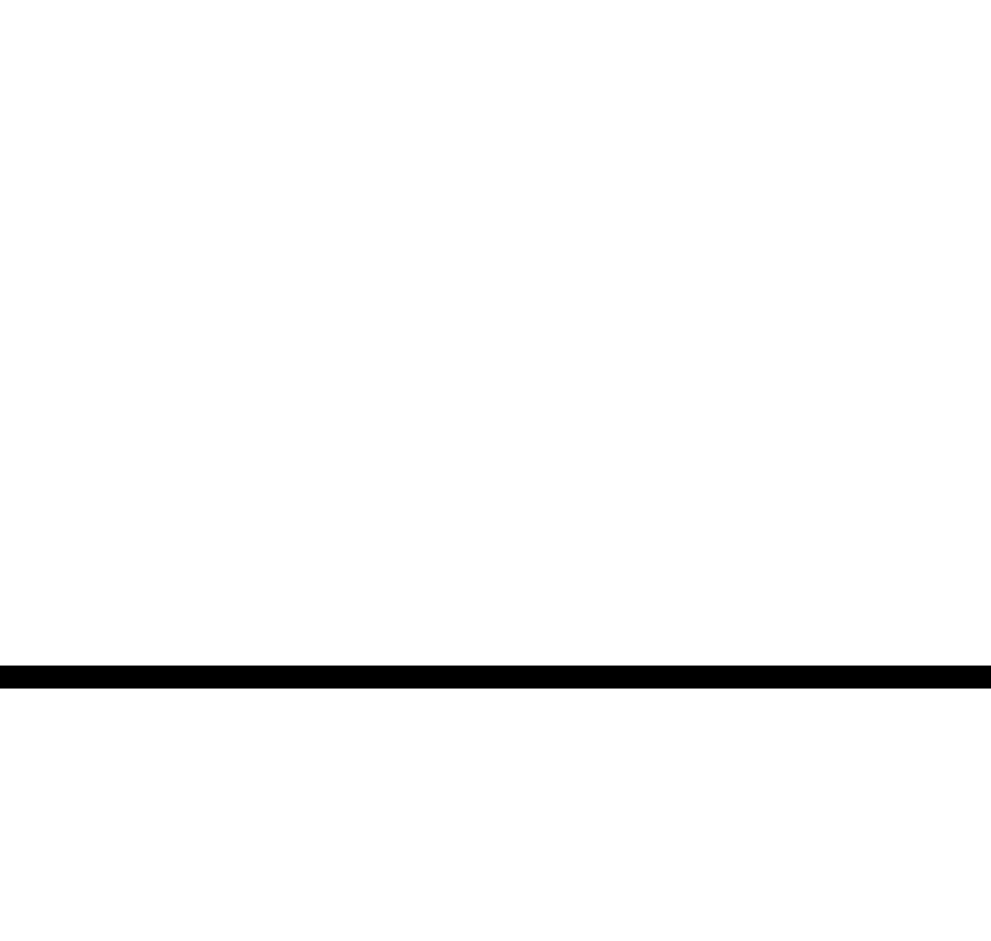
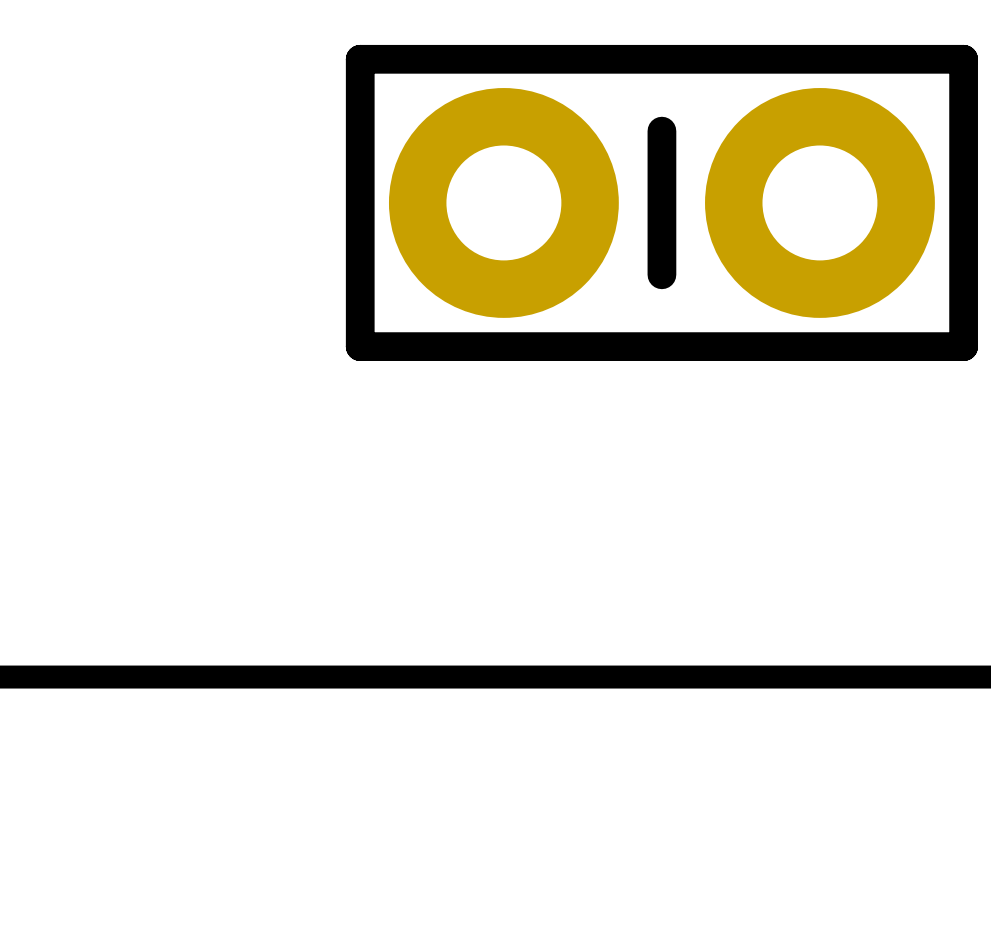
part: none -> (661, 202)

